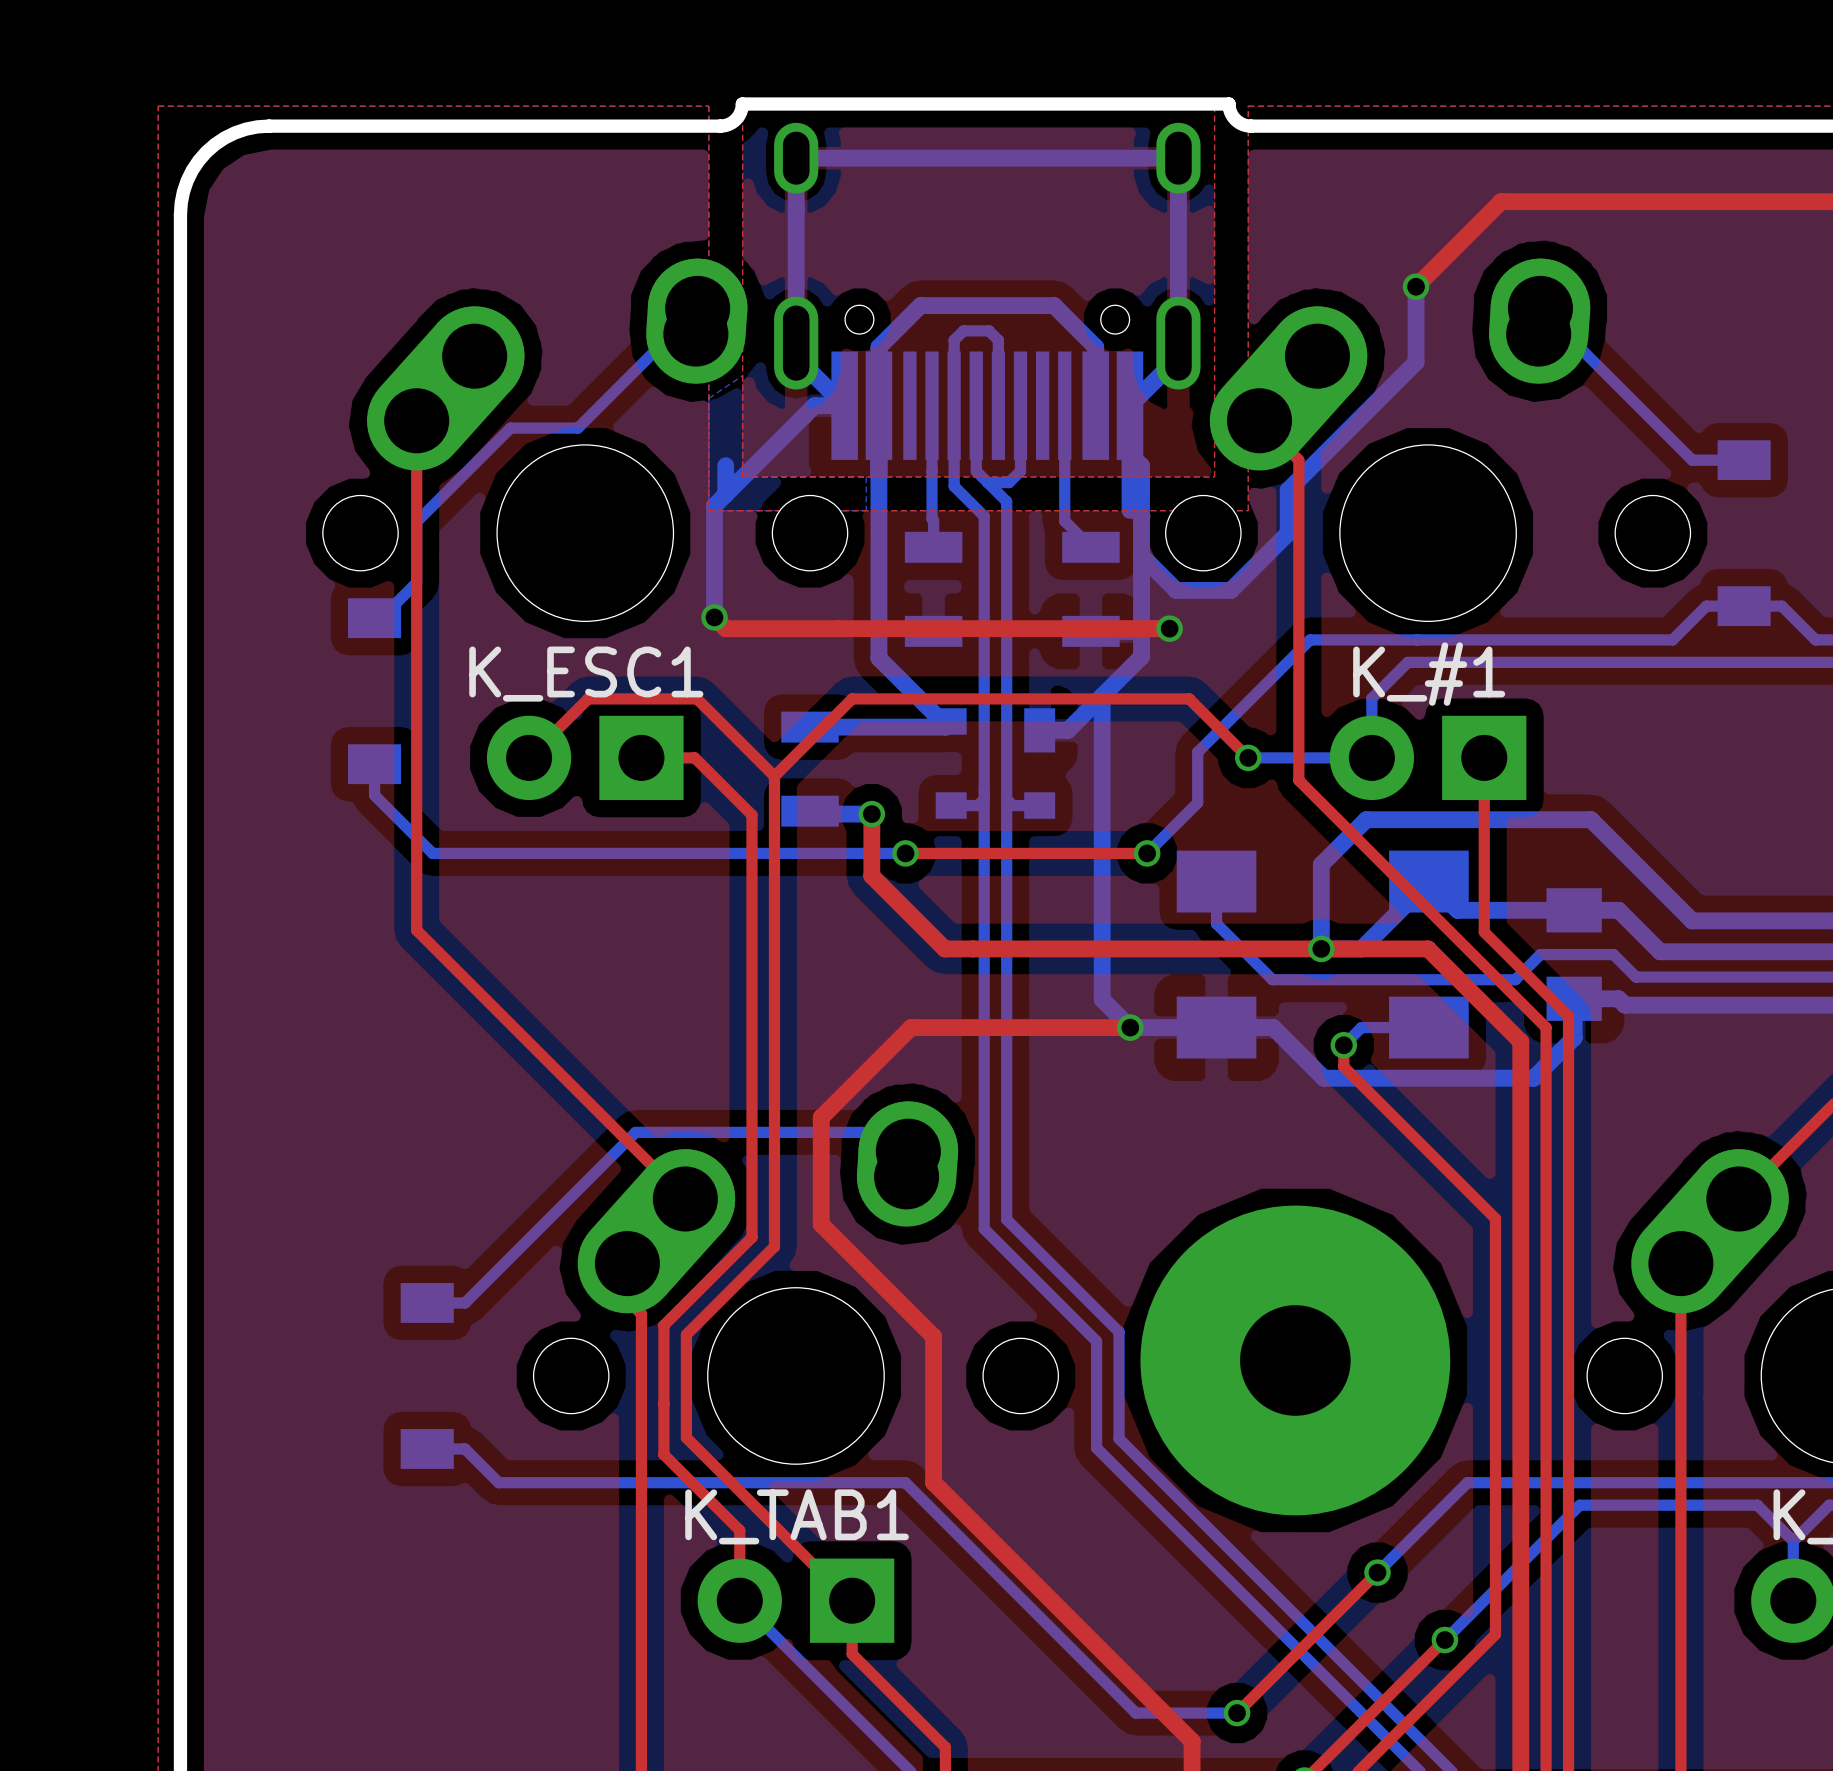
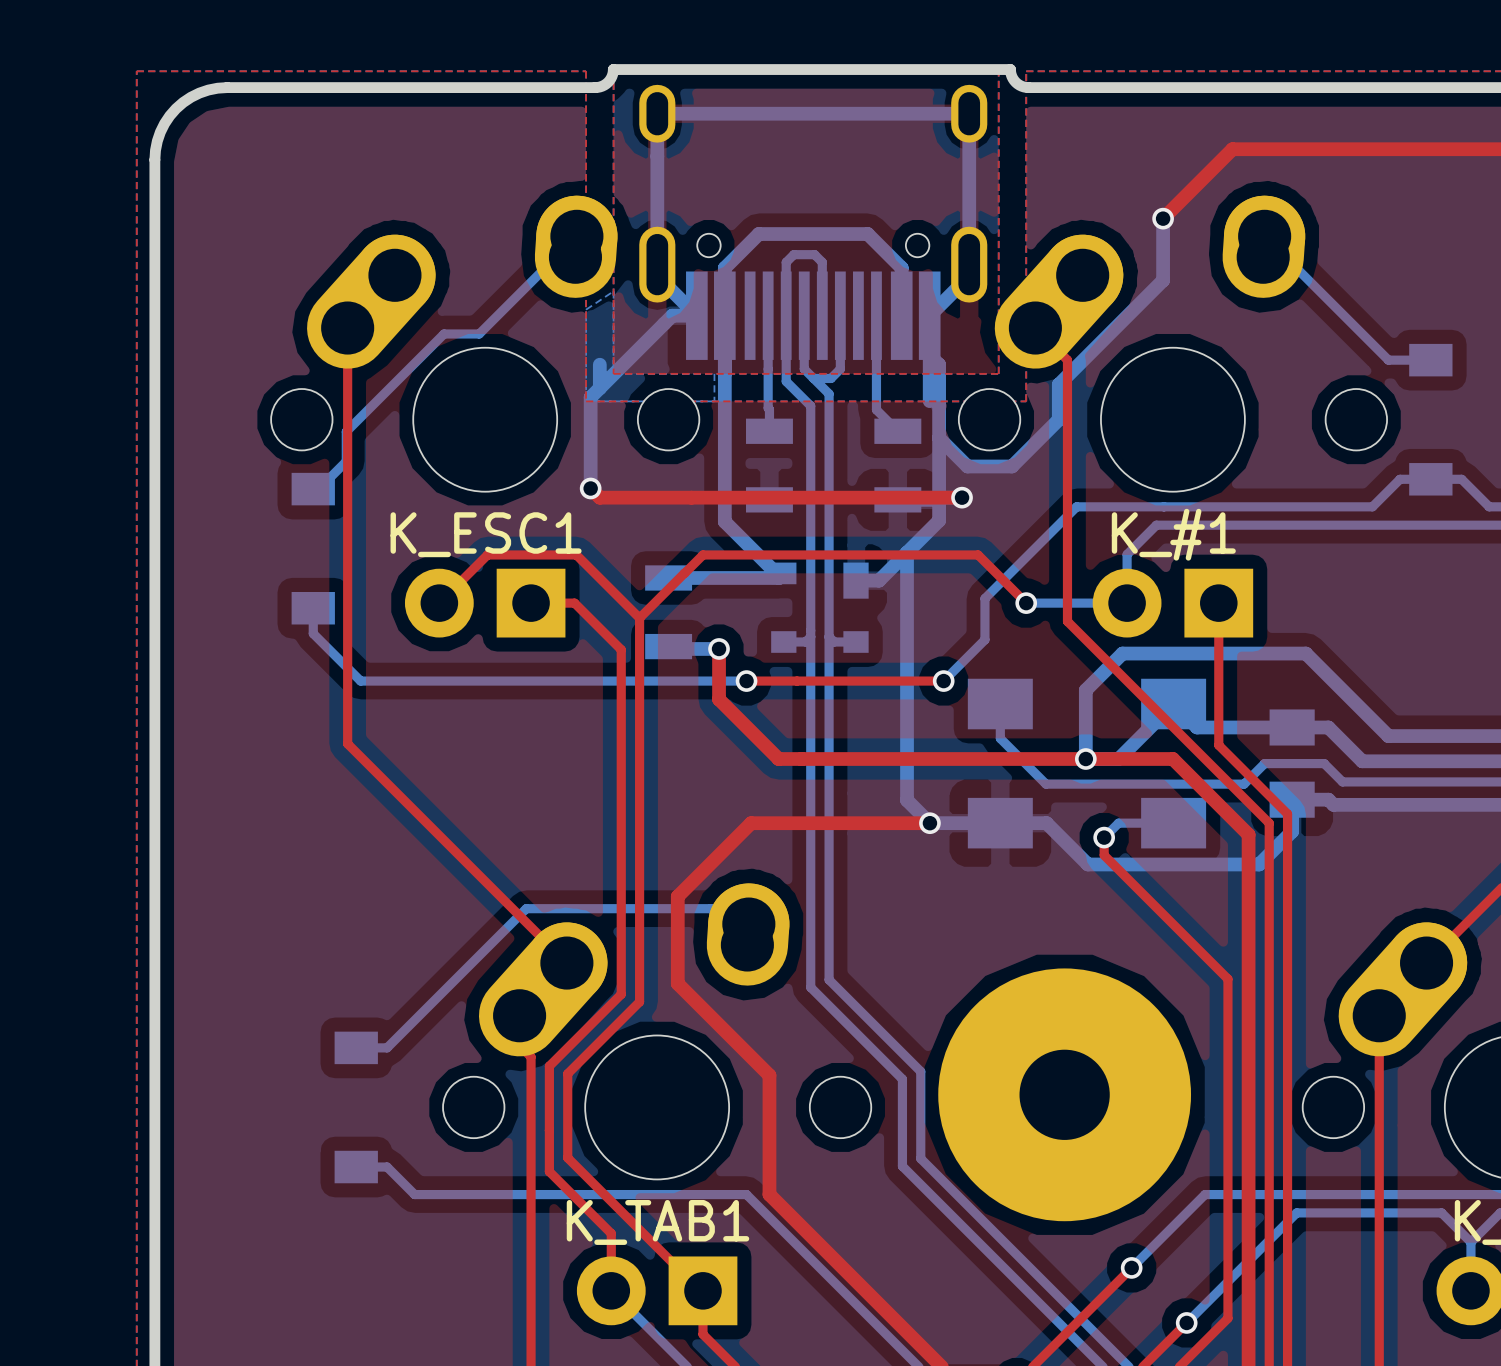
bottom track: (534, 428) (510, 428) (416, 521) (416, 582) (415, 584) -> (444, 333) (346, 431) (346, 461)

